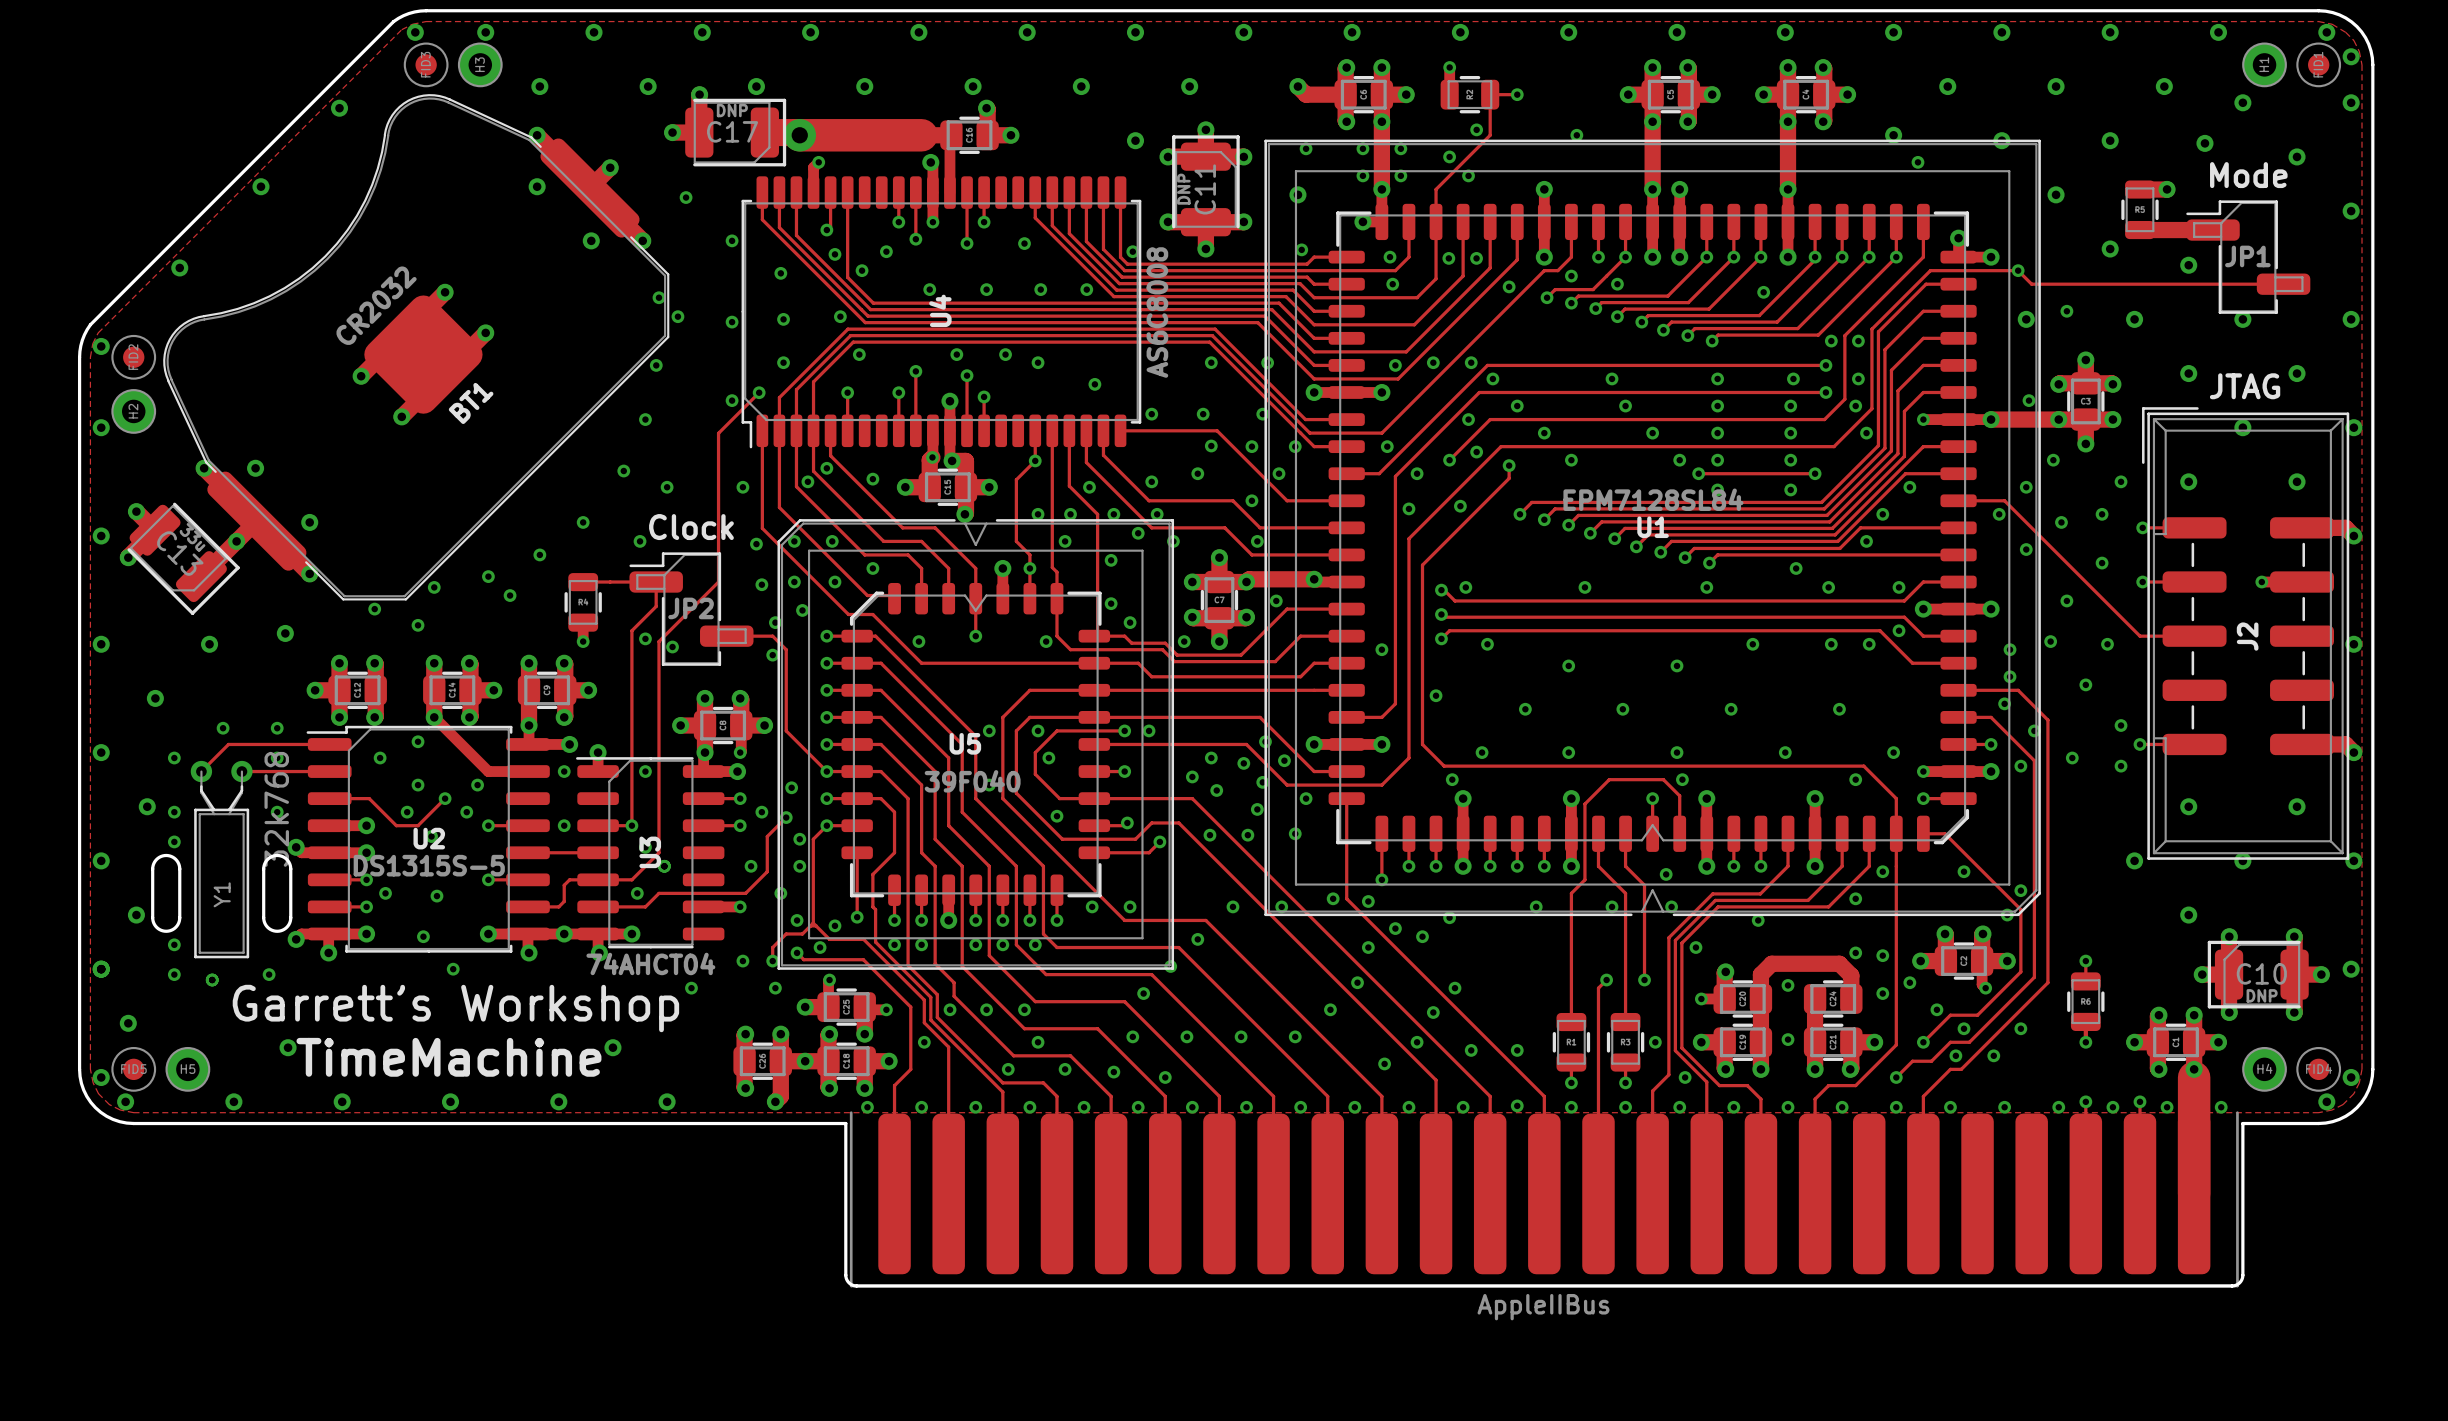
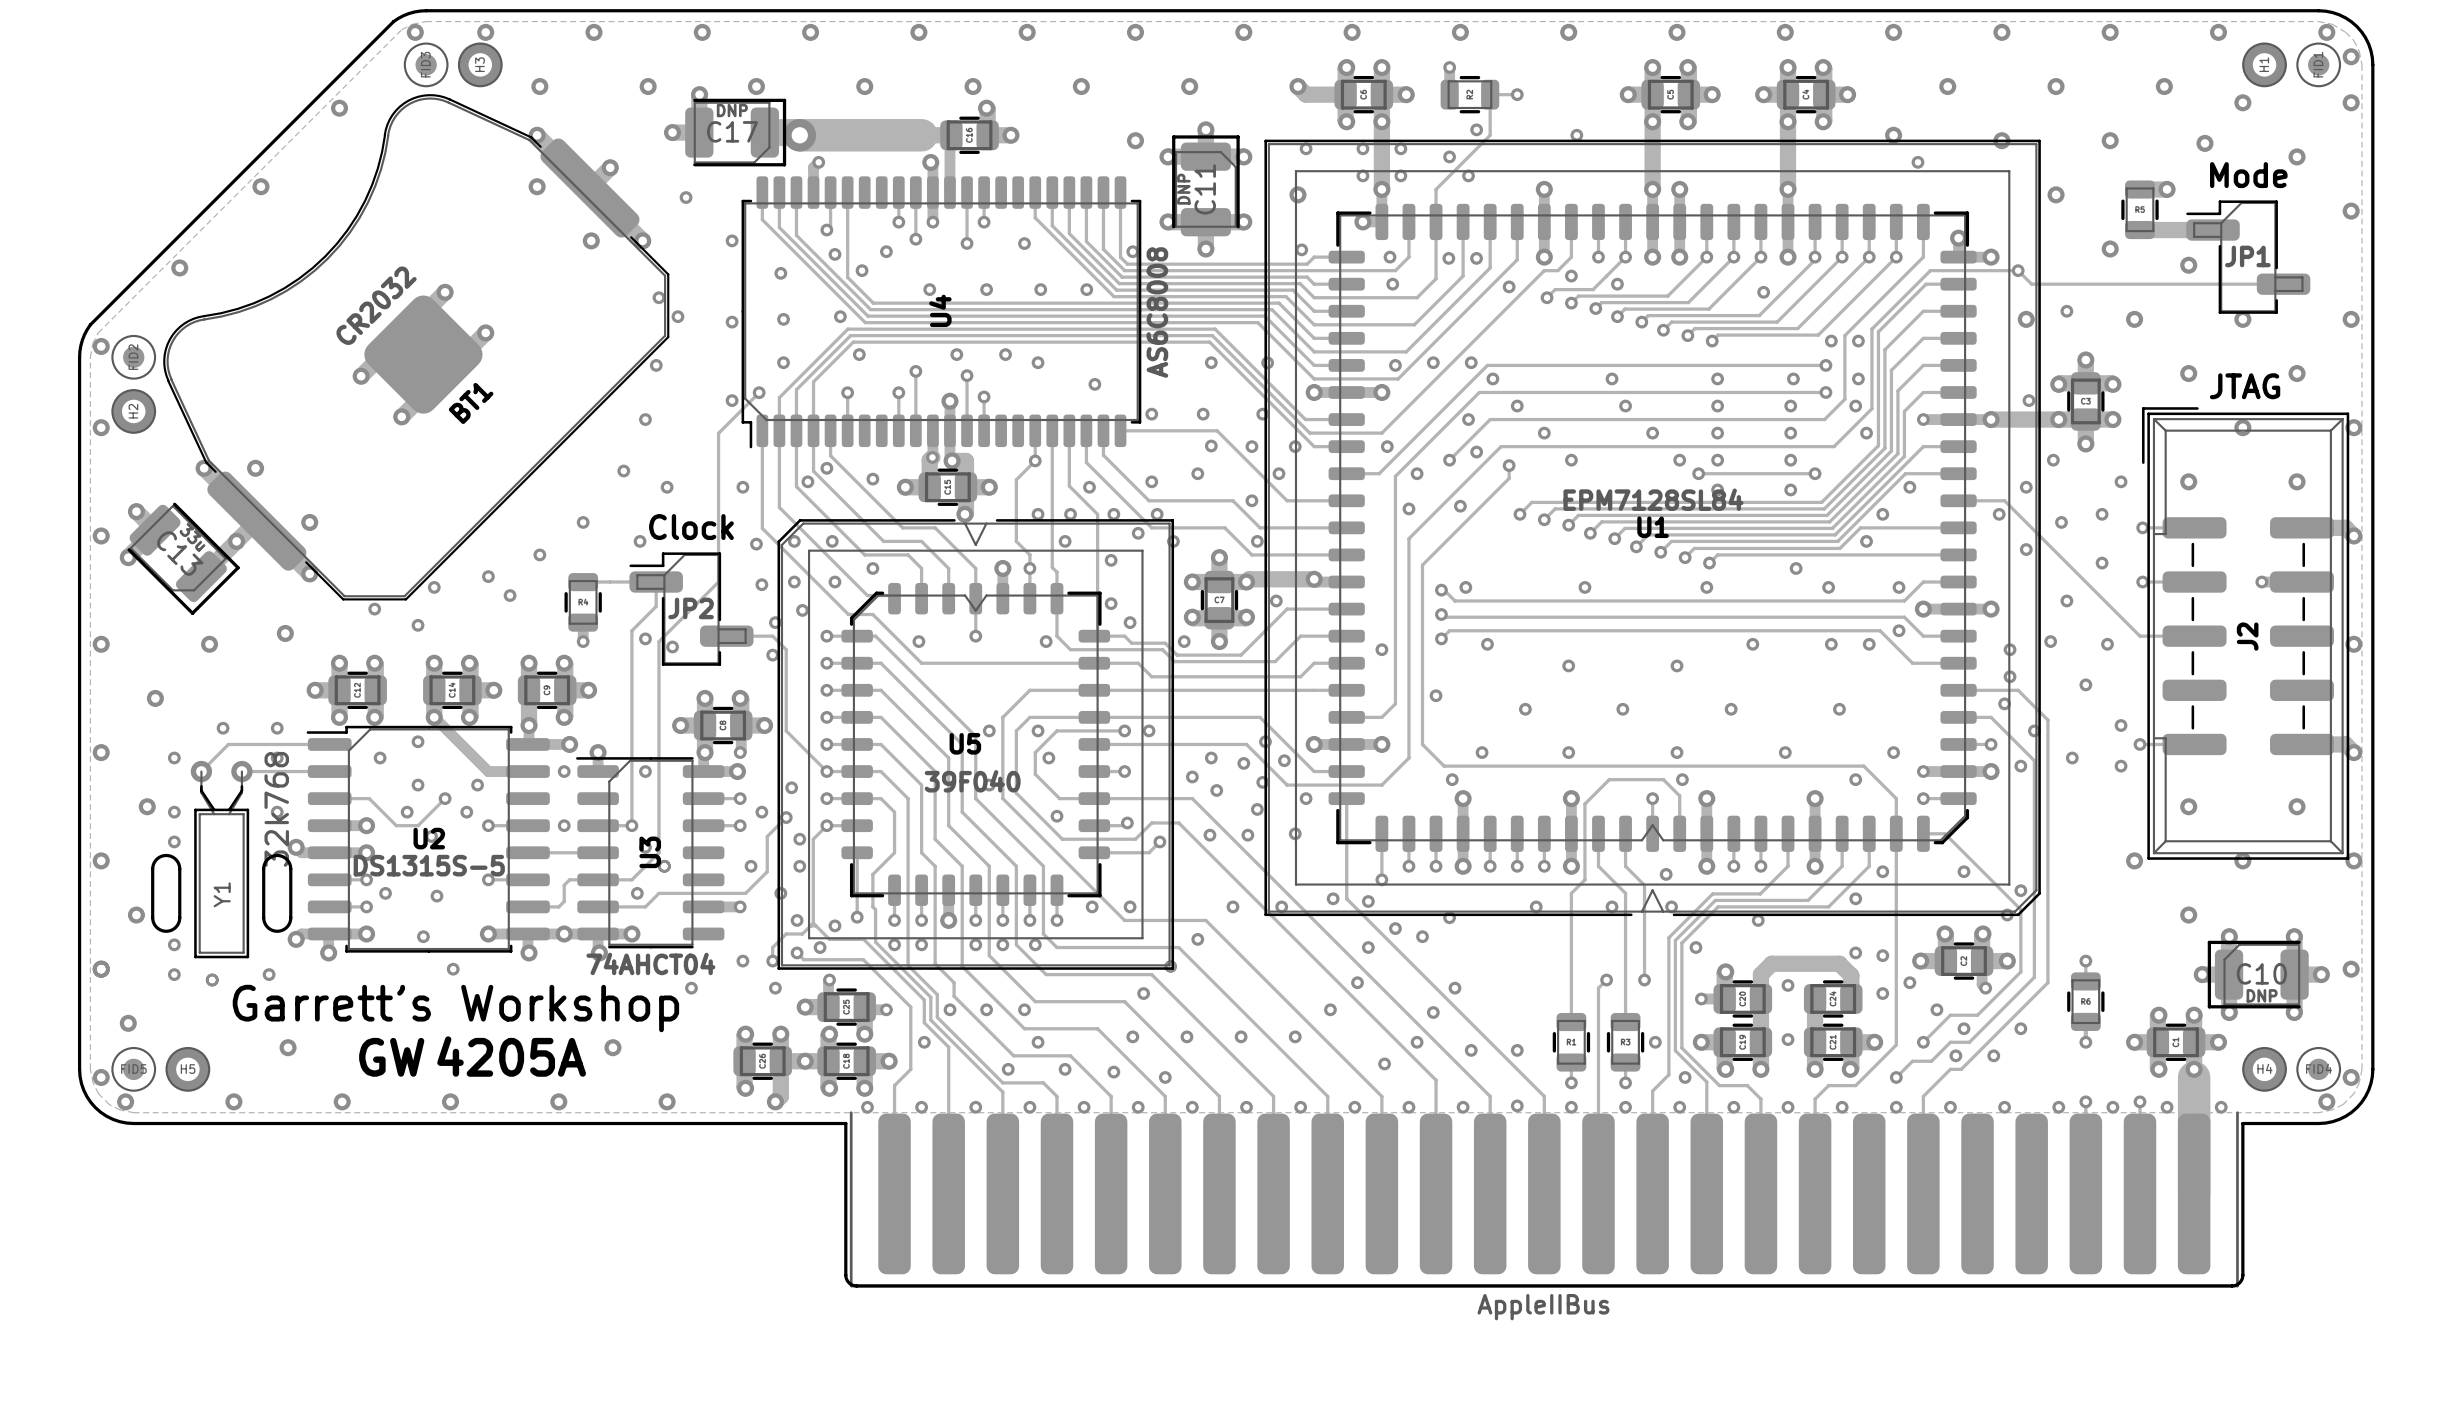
text: none -> 4205A (511, 1056)
text: none -> GW (391, 1057)
text: TimeMachine (448, 1057) -> none

